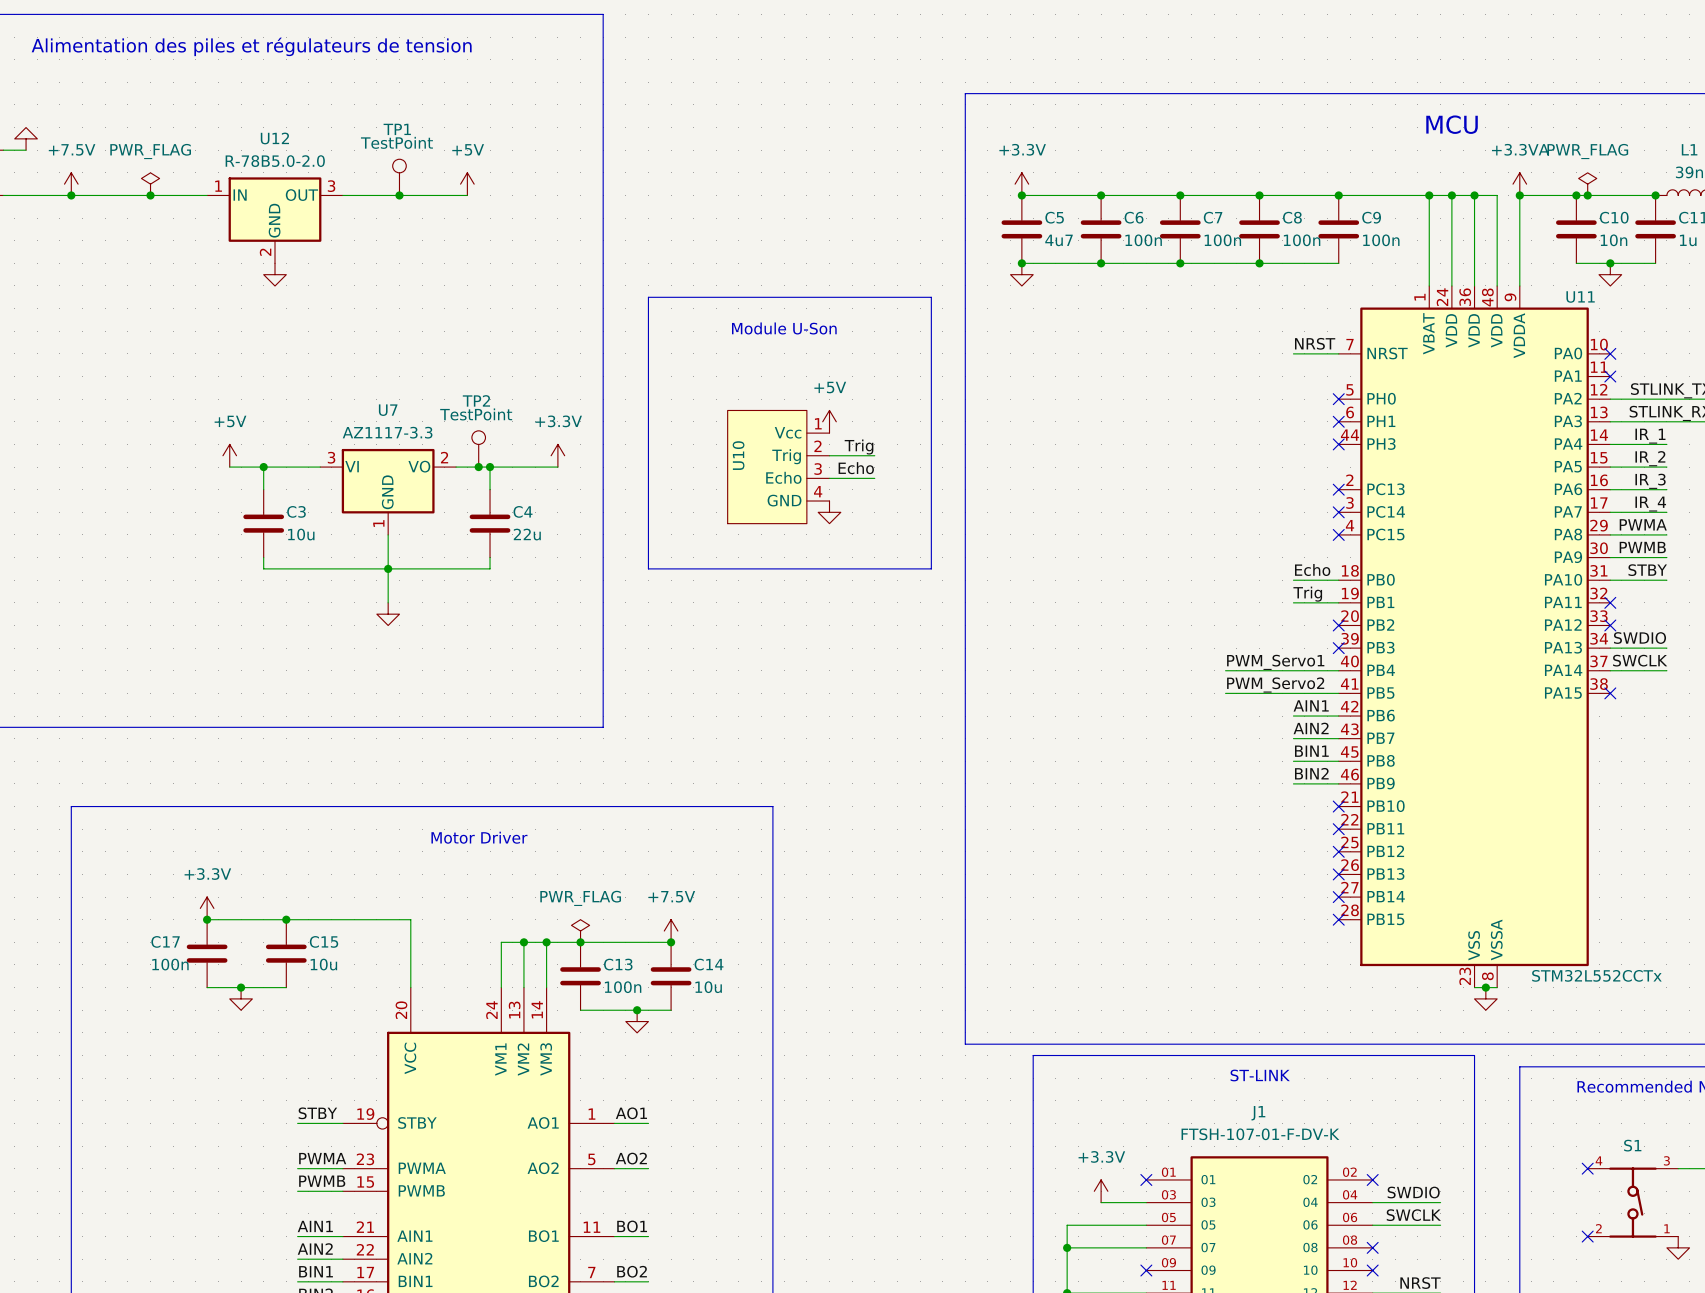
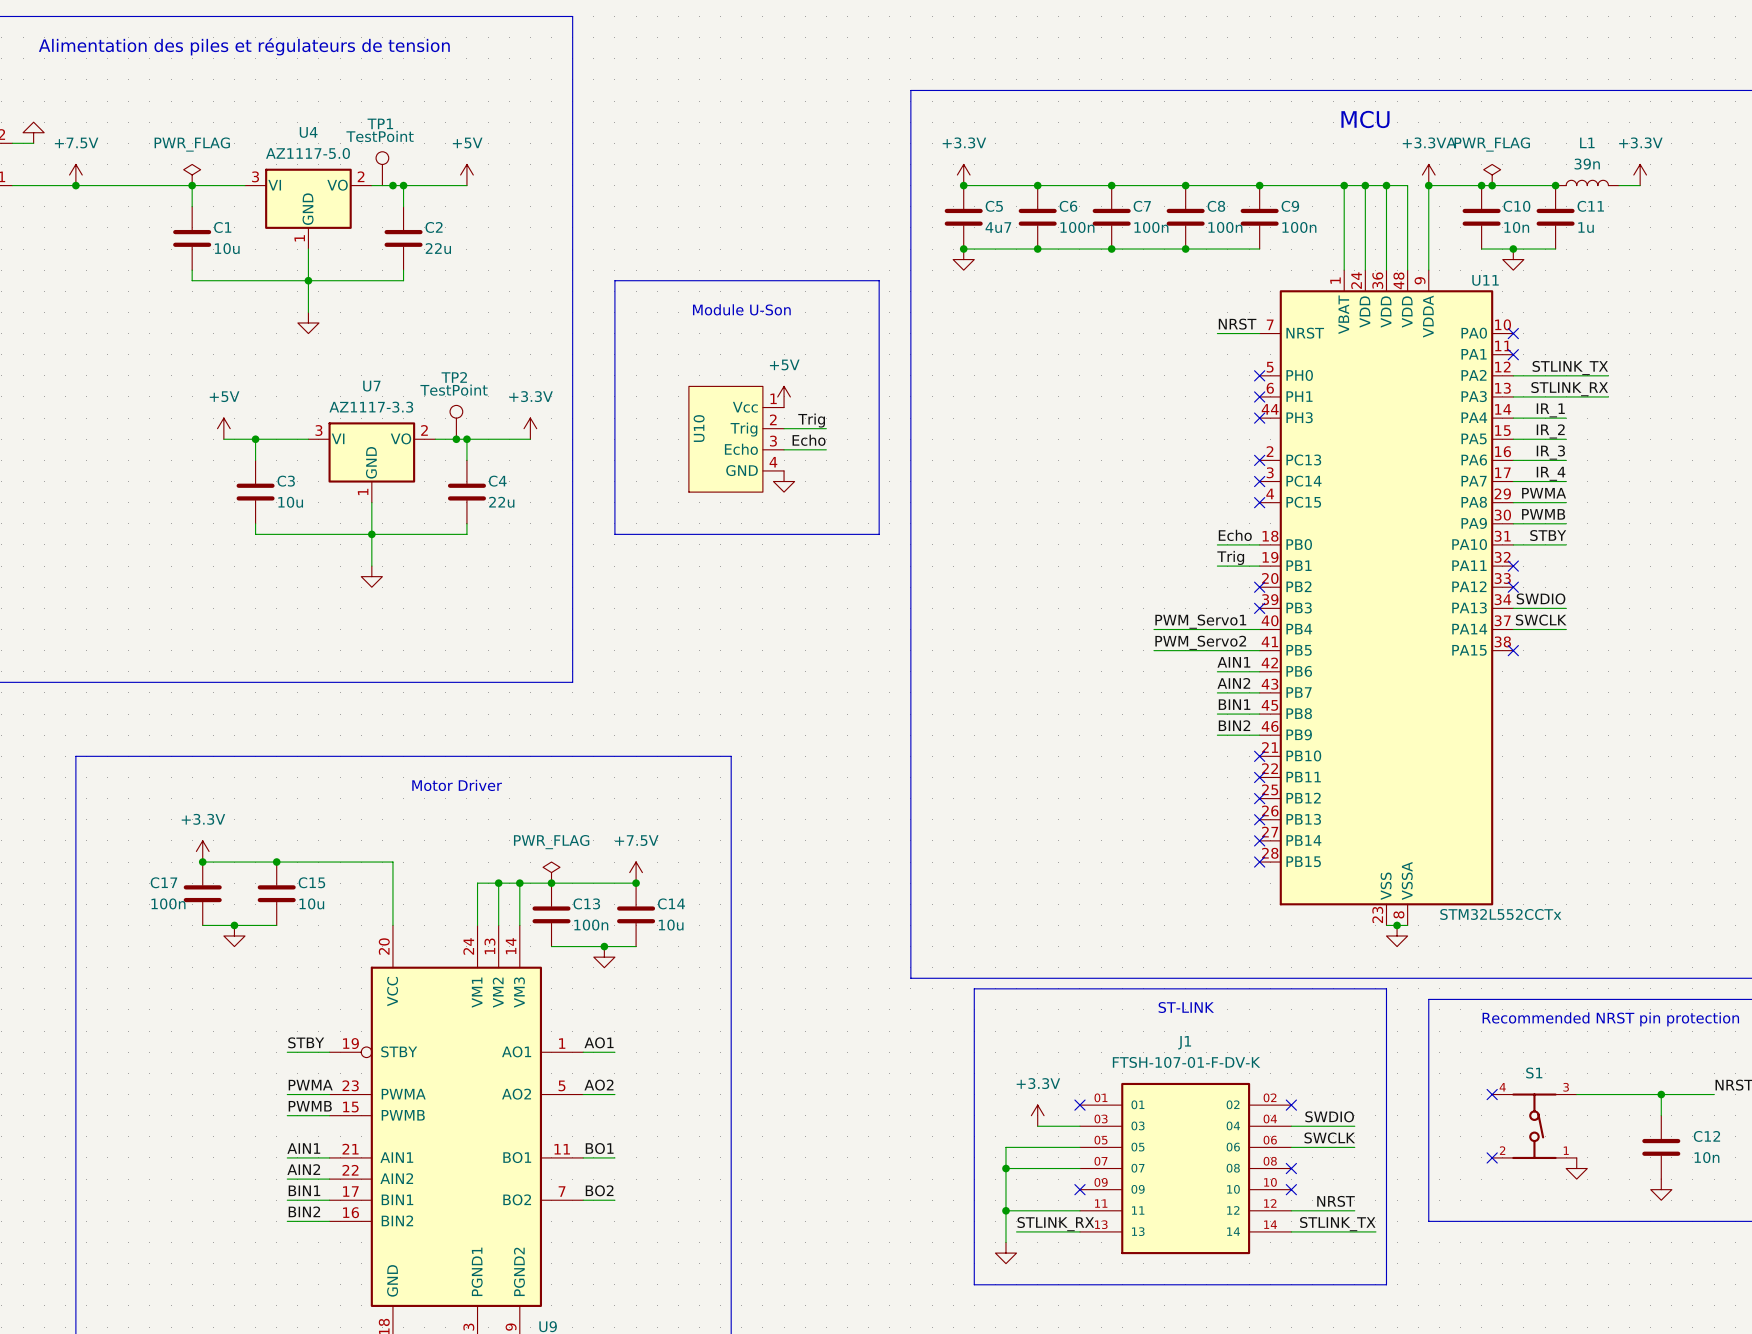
power symbol position: PWR_FLAG (150, 184) -> PWR_FLAG (192, 175)
power symbol position: +5V (467, 184) -> +5V (466, 175)
junction position: (150, 195) -> (192, 185)
wire: none -> (192, 185) (192, 206)
junction: (399, 195) -> none
junction: none -> (392, 185)
wire: none -> (403, 185) (403, 206)
junction: none -> (403, 185)
wire: none -> (445, 185) (466, 185)
U12: R-78B5.0-2.0 (275, 220) -> none
U4: none -> AZ1117-5.0 (308, 208)
C1: none -> 10u (192, 238)
C2: none -> 22u (403, 238)
wire: none -> (308, 249) (308, 312)
power symbol position: (275, 274) -> (308, 322)
wire: none -> (192, 270) (192, 280) (403, 280) (403, 270)
junction: none -> (308, 280)

